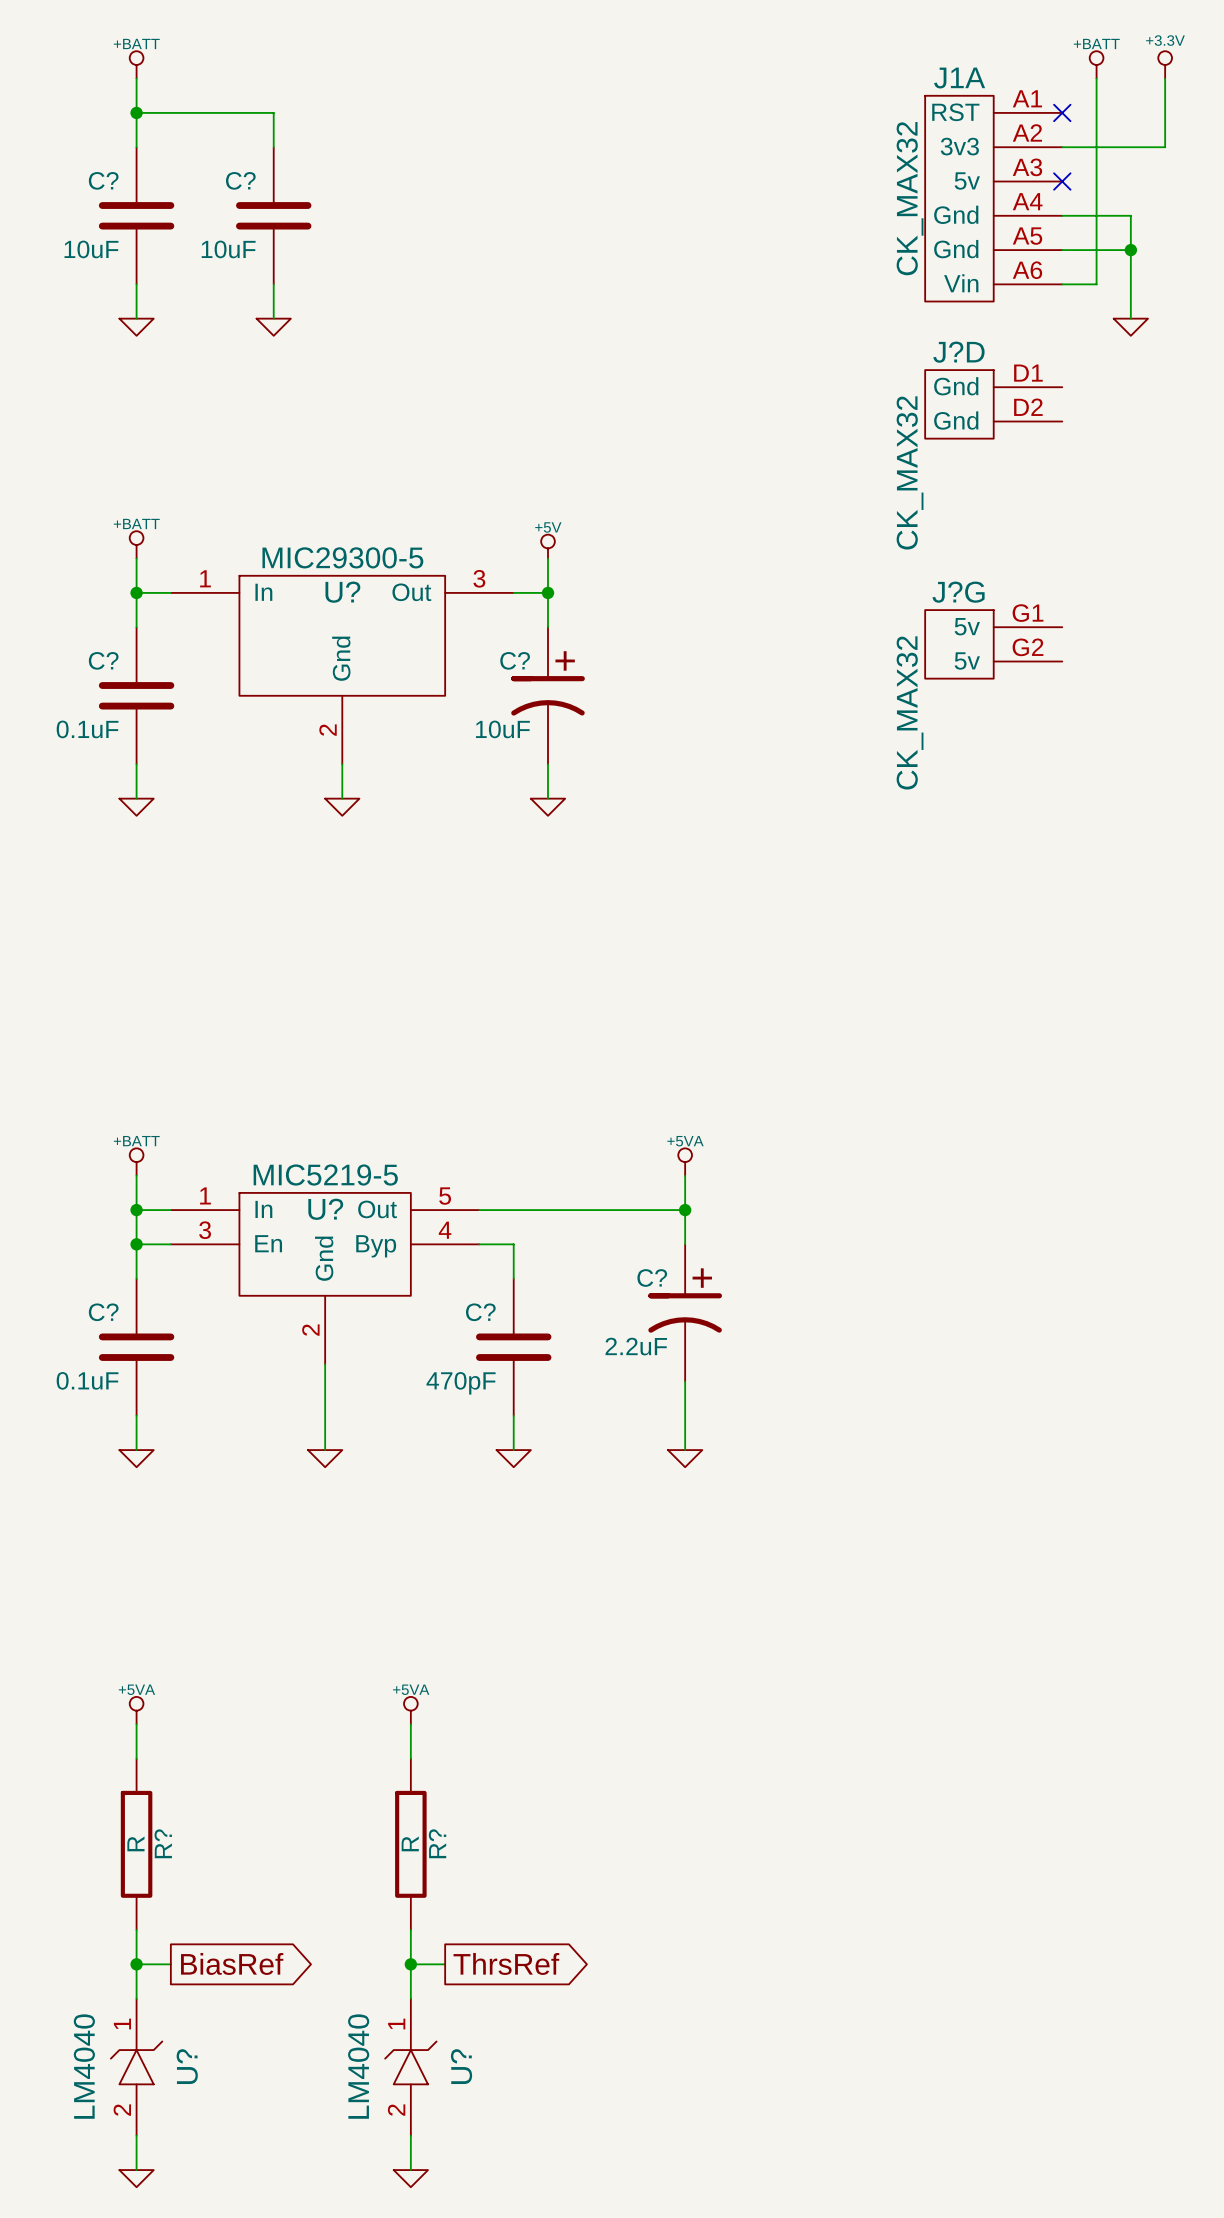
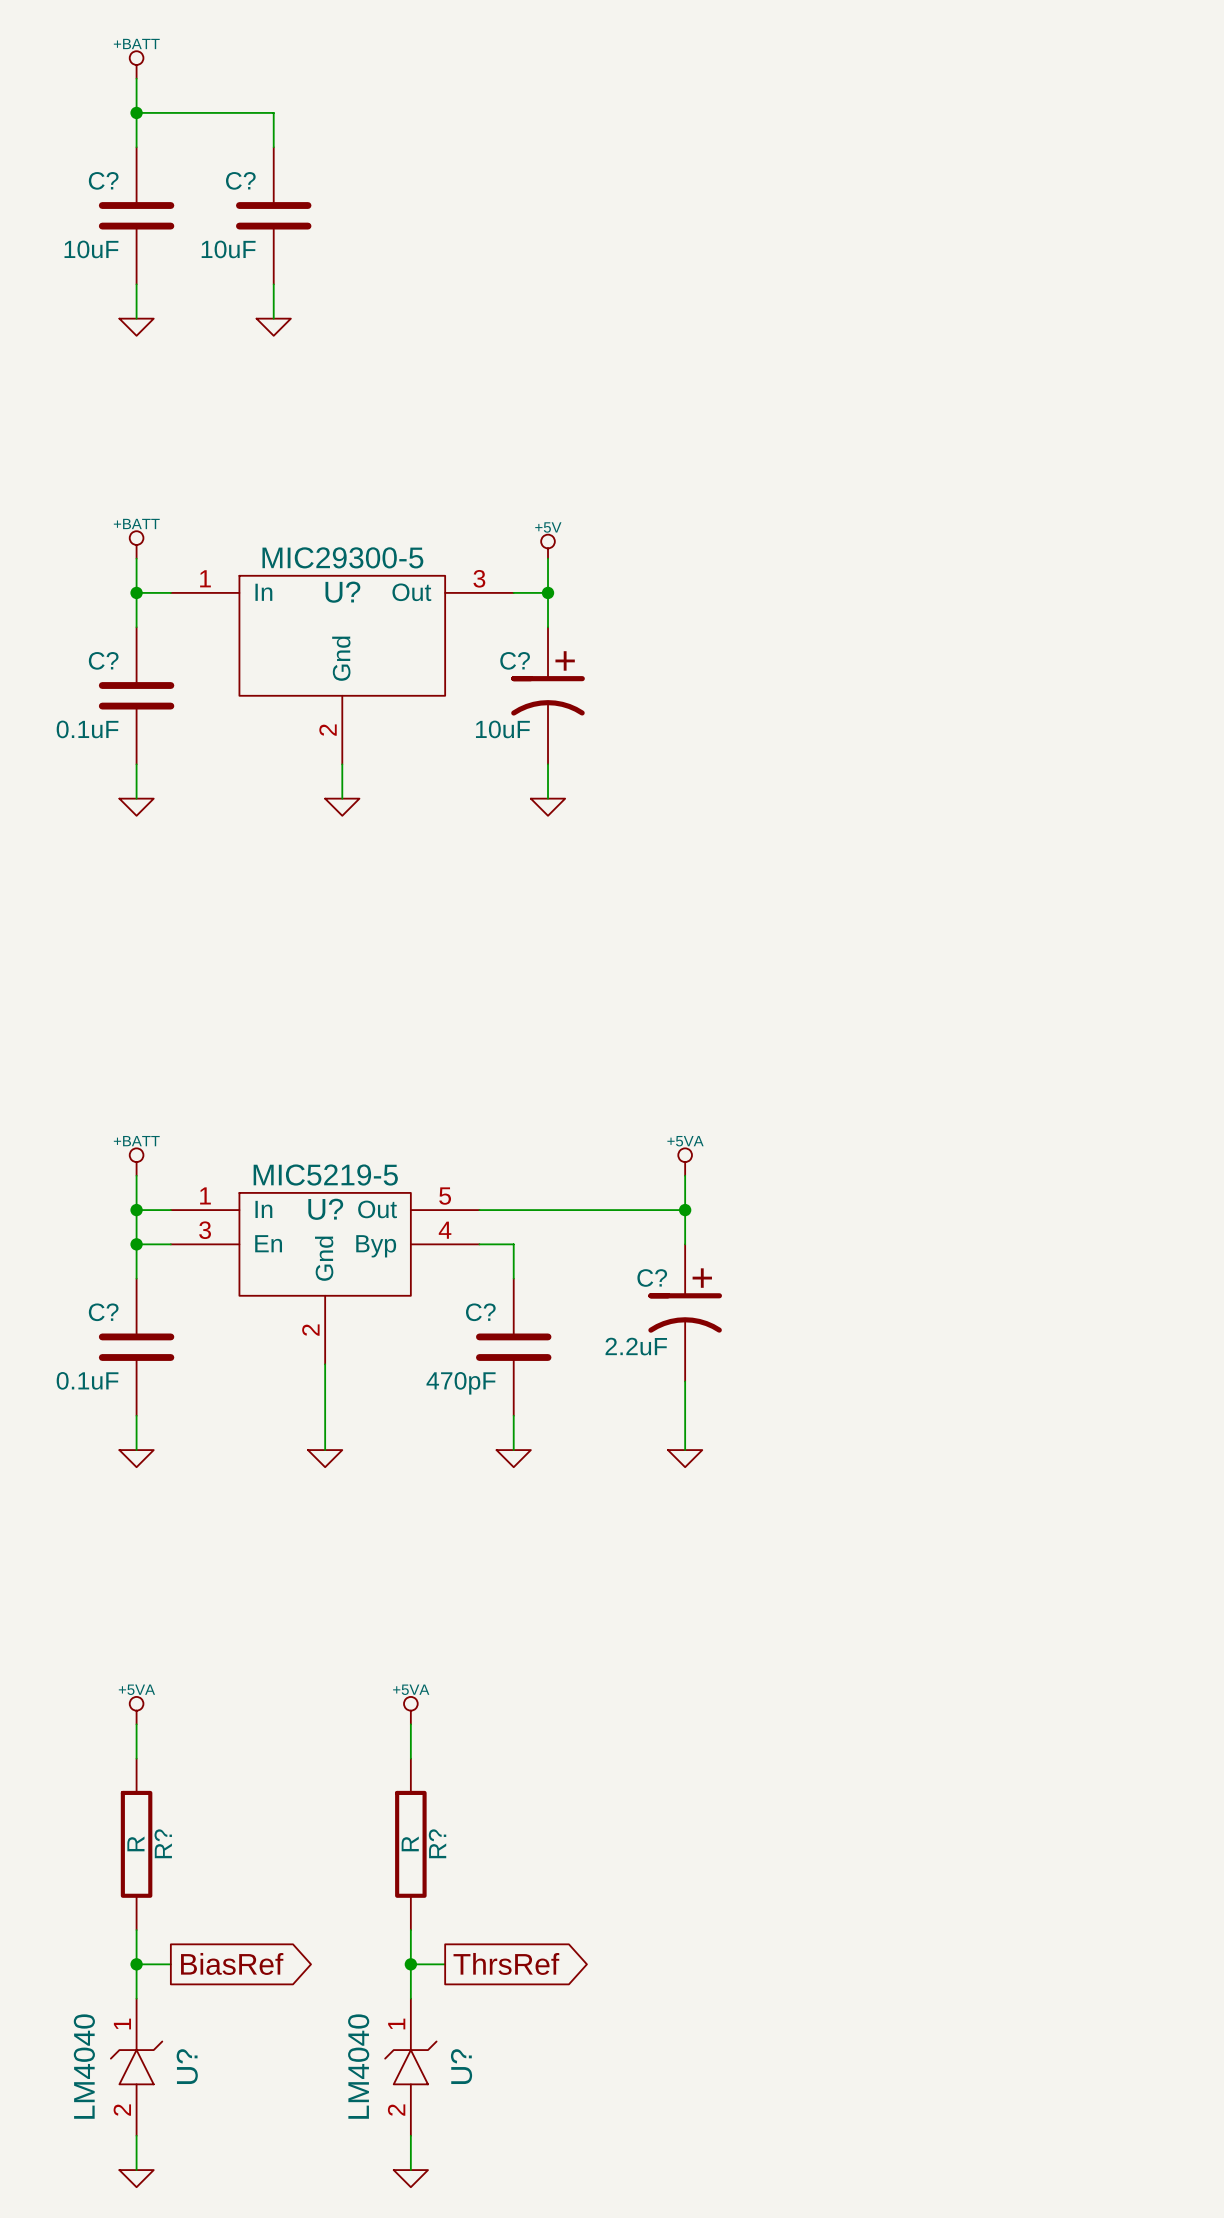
power symbol: +BATT (1096, 64) -> none
power symbol: +3.3V (1165, 64) -> none
wire: (1096, 78) (1096, 284) (1062, 284) -> none
wire: (1165, 78) (1165, 147) (1062, 147) -> none
no-connect mark: (1062, 112) -> none
no-connect mark: (1062, 181) -> none
J1A: CK_MAX32 (993, 198) -> none
wire: (1062, 215) (1130, 215) (1130, 318) -> none
wire: (1062, 250) (1130, 250) -> none
junction: (1130, 250) -> none
power symbol: (1130, 327) -> none
J?D: CK_MAX32 (993, 404) -> none
J?G: CK_MAX32 (993, 644) -> none

